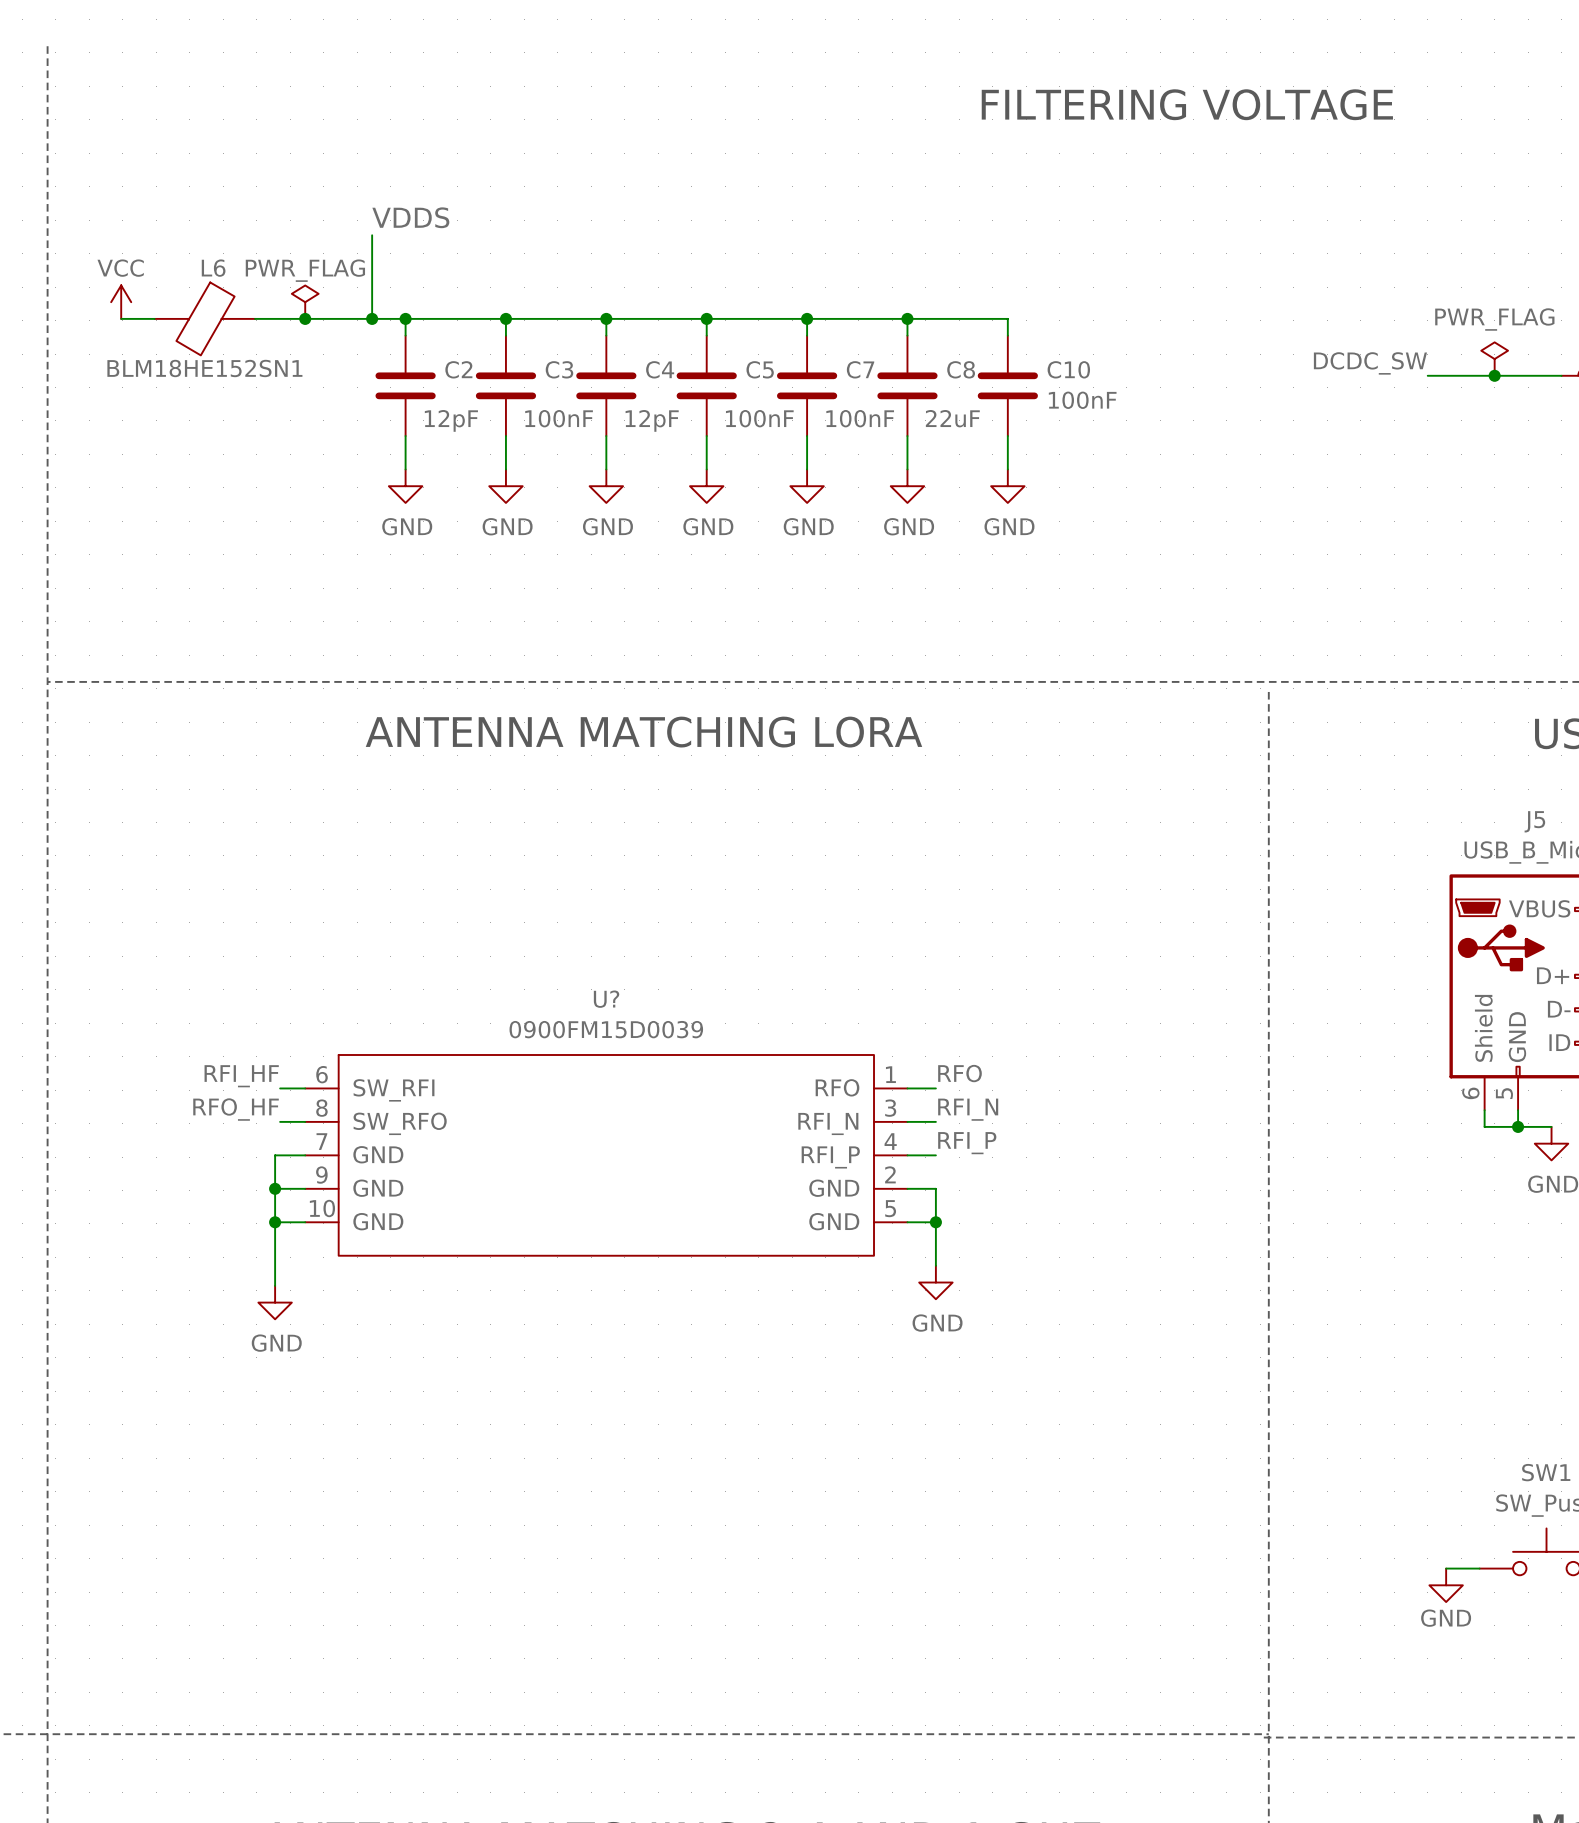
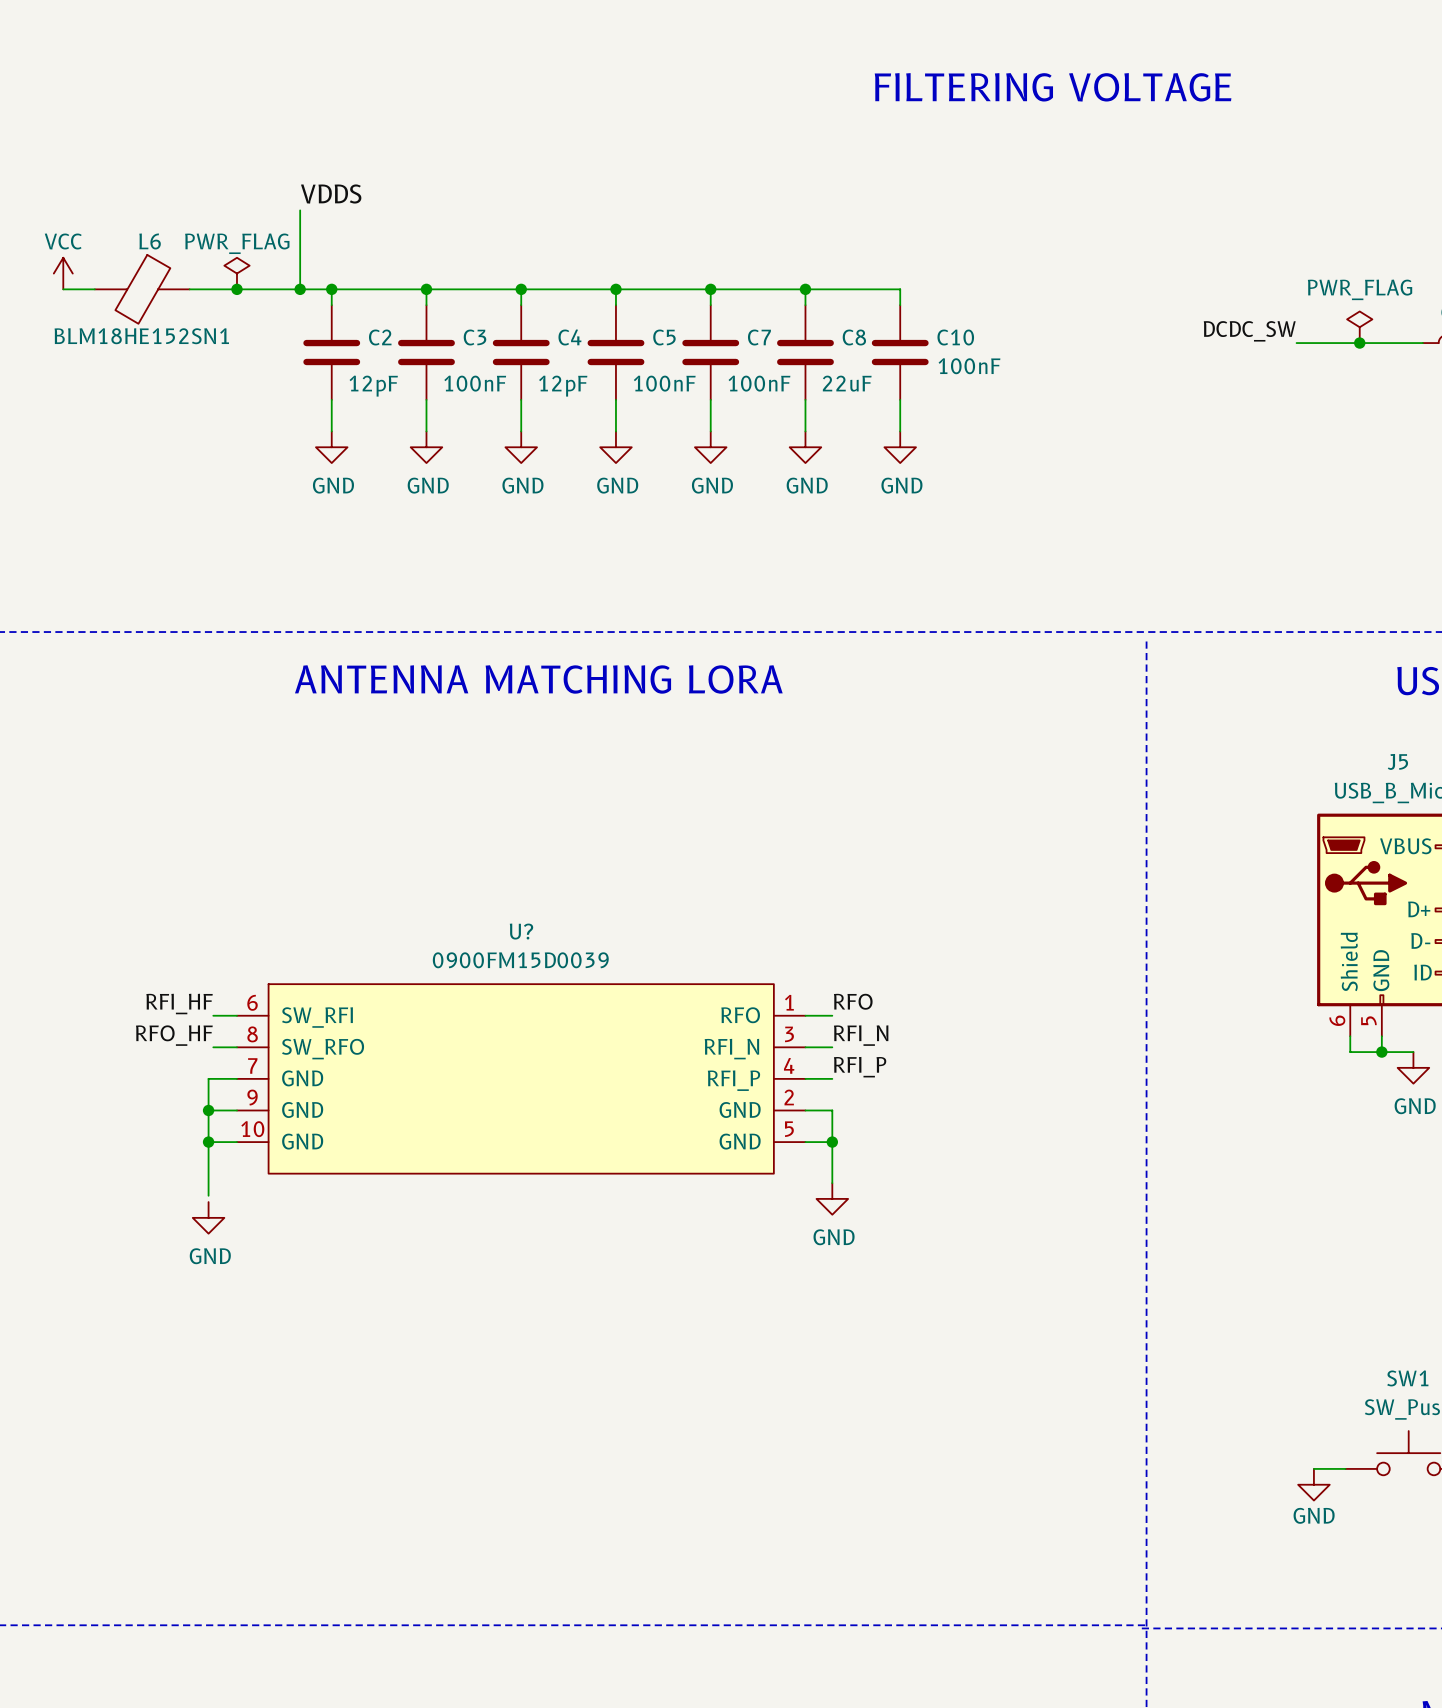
wire: (275, 1279) (275, 1285) -> none

